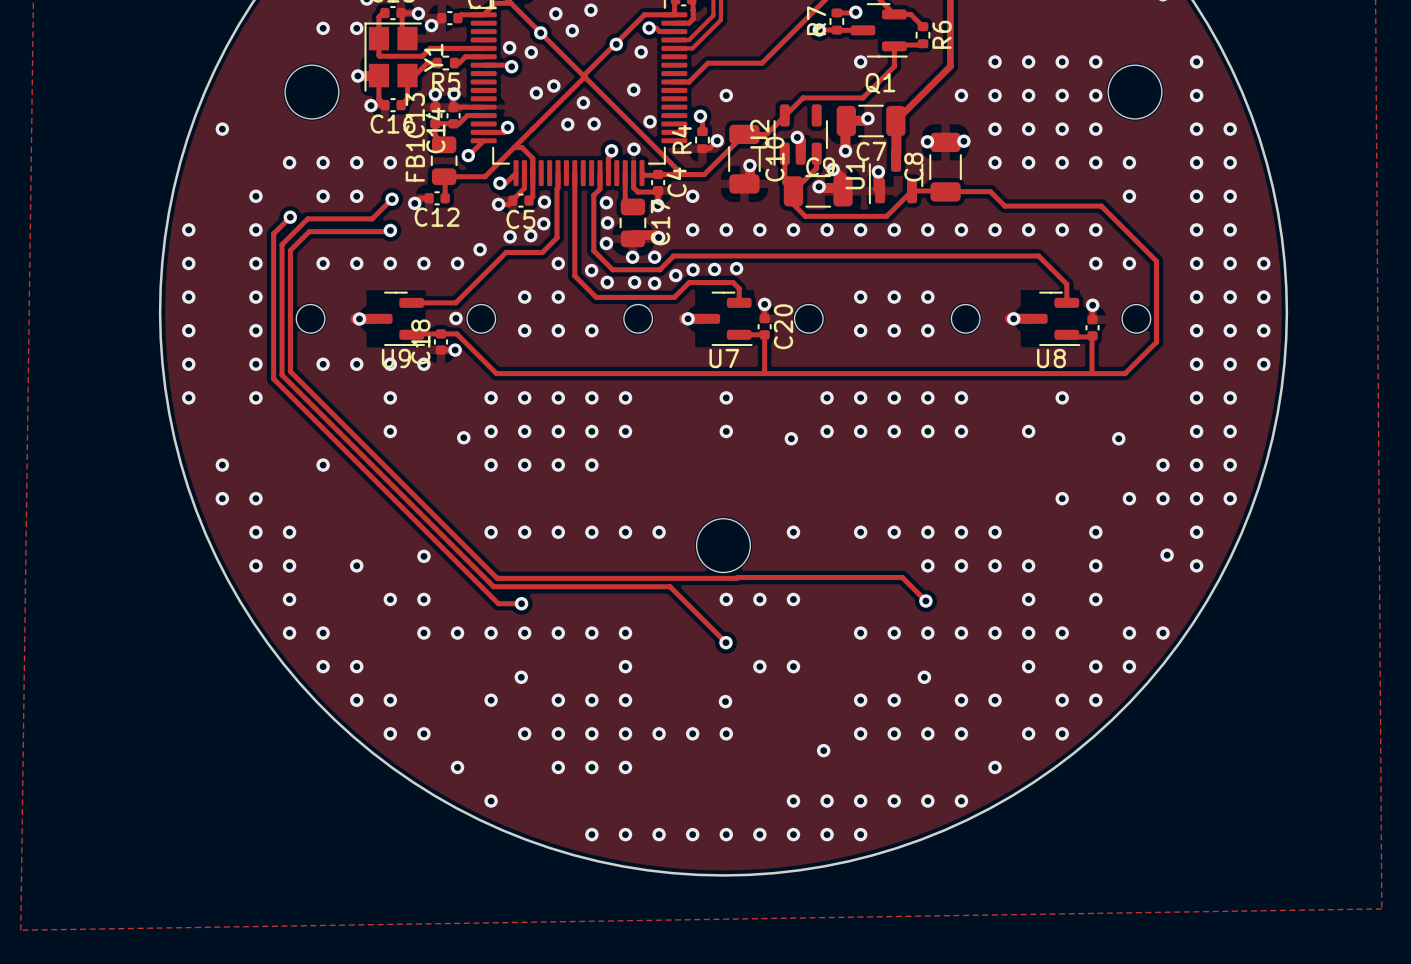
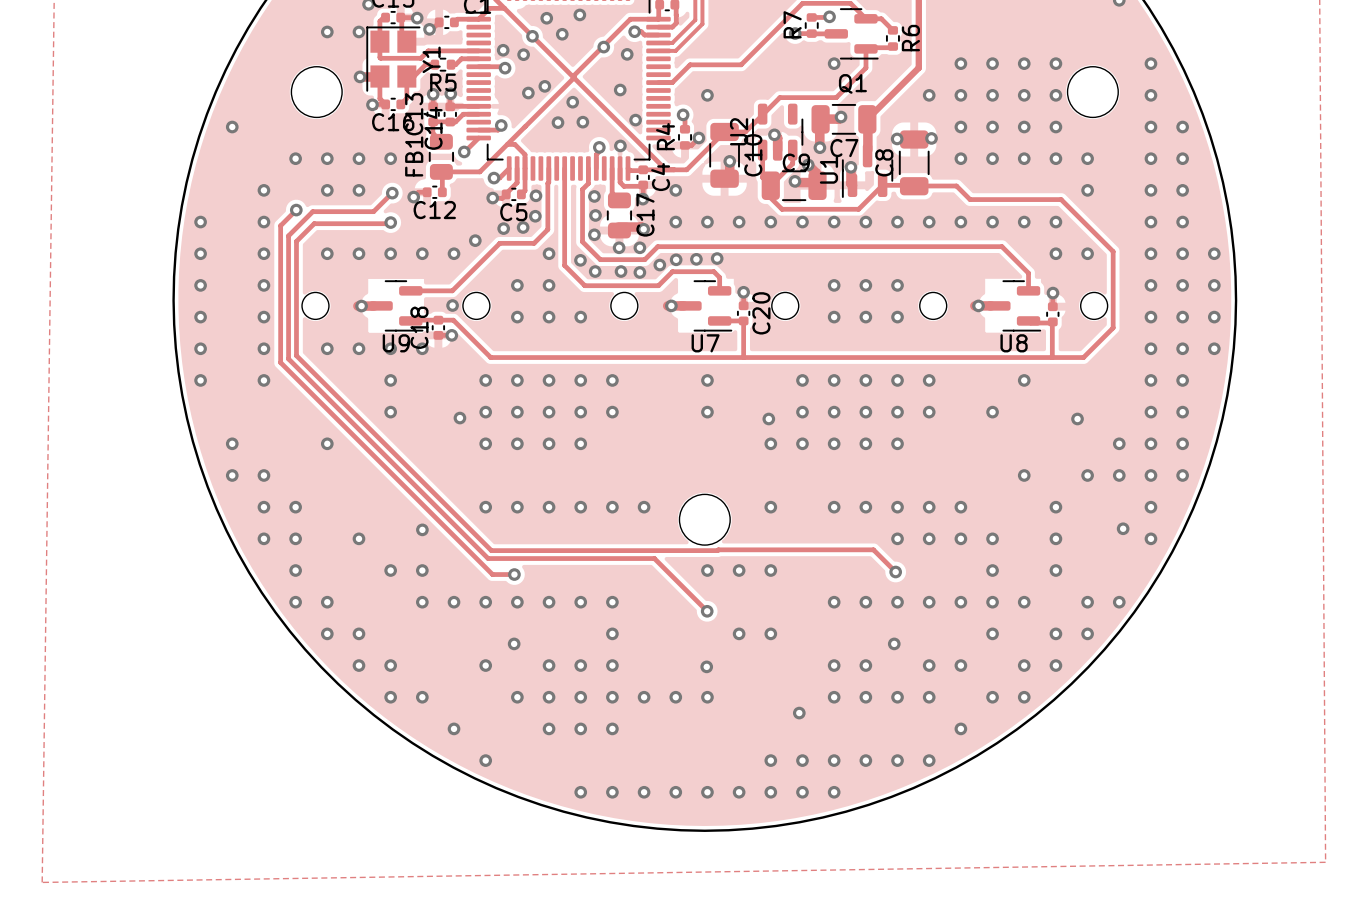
via: none -> (770, 443)
via: none -> (802, 443)
via: none -> (834, 443)
via: none -> (865, 443)
via: none -> (897, 443)

